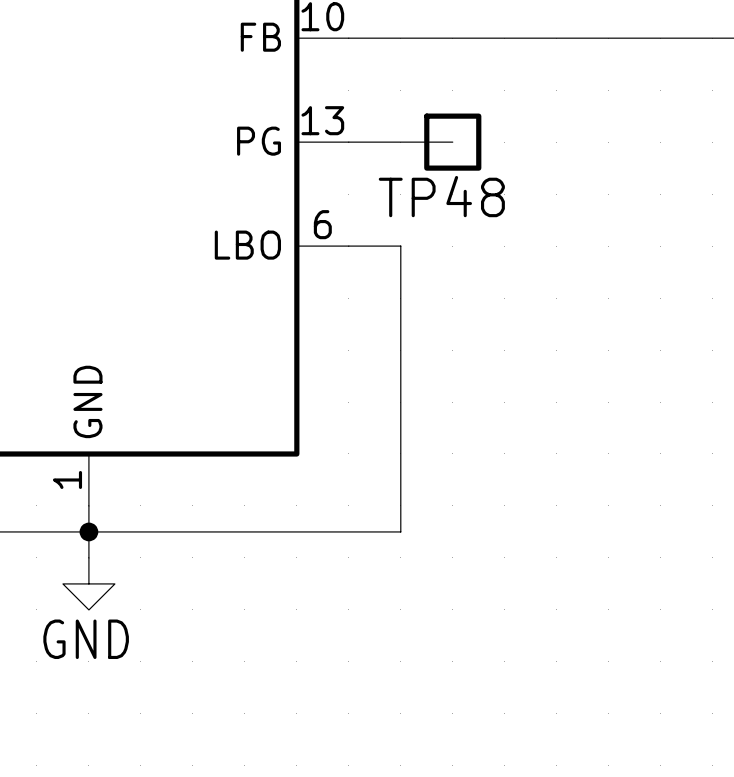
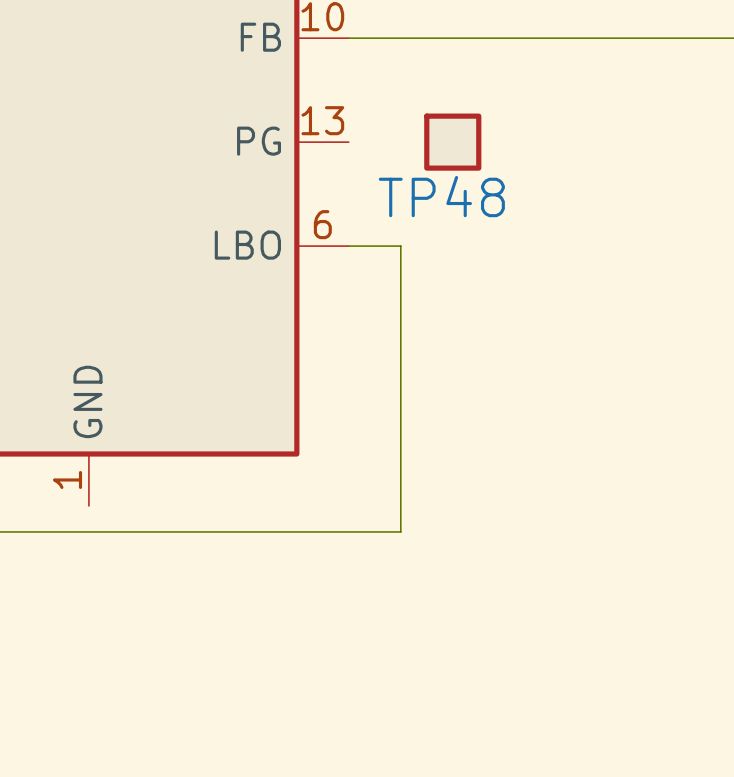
wire: (348, 142) (452, 142) -> none
wire: (88, 505) (88, 557) -> none
junction: (88, 531) -> none
power symbol: GND (88, 583) -> none

